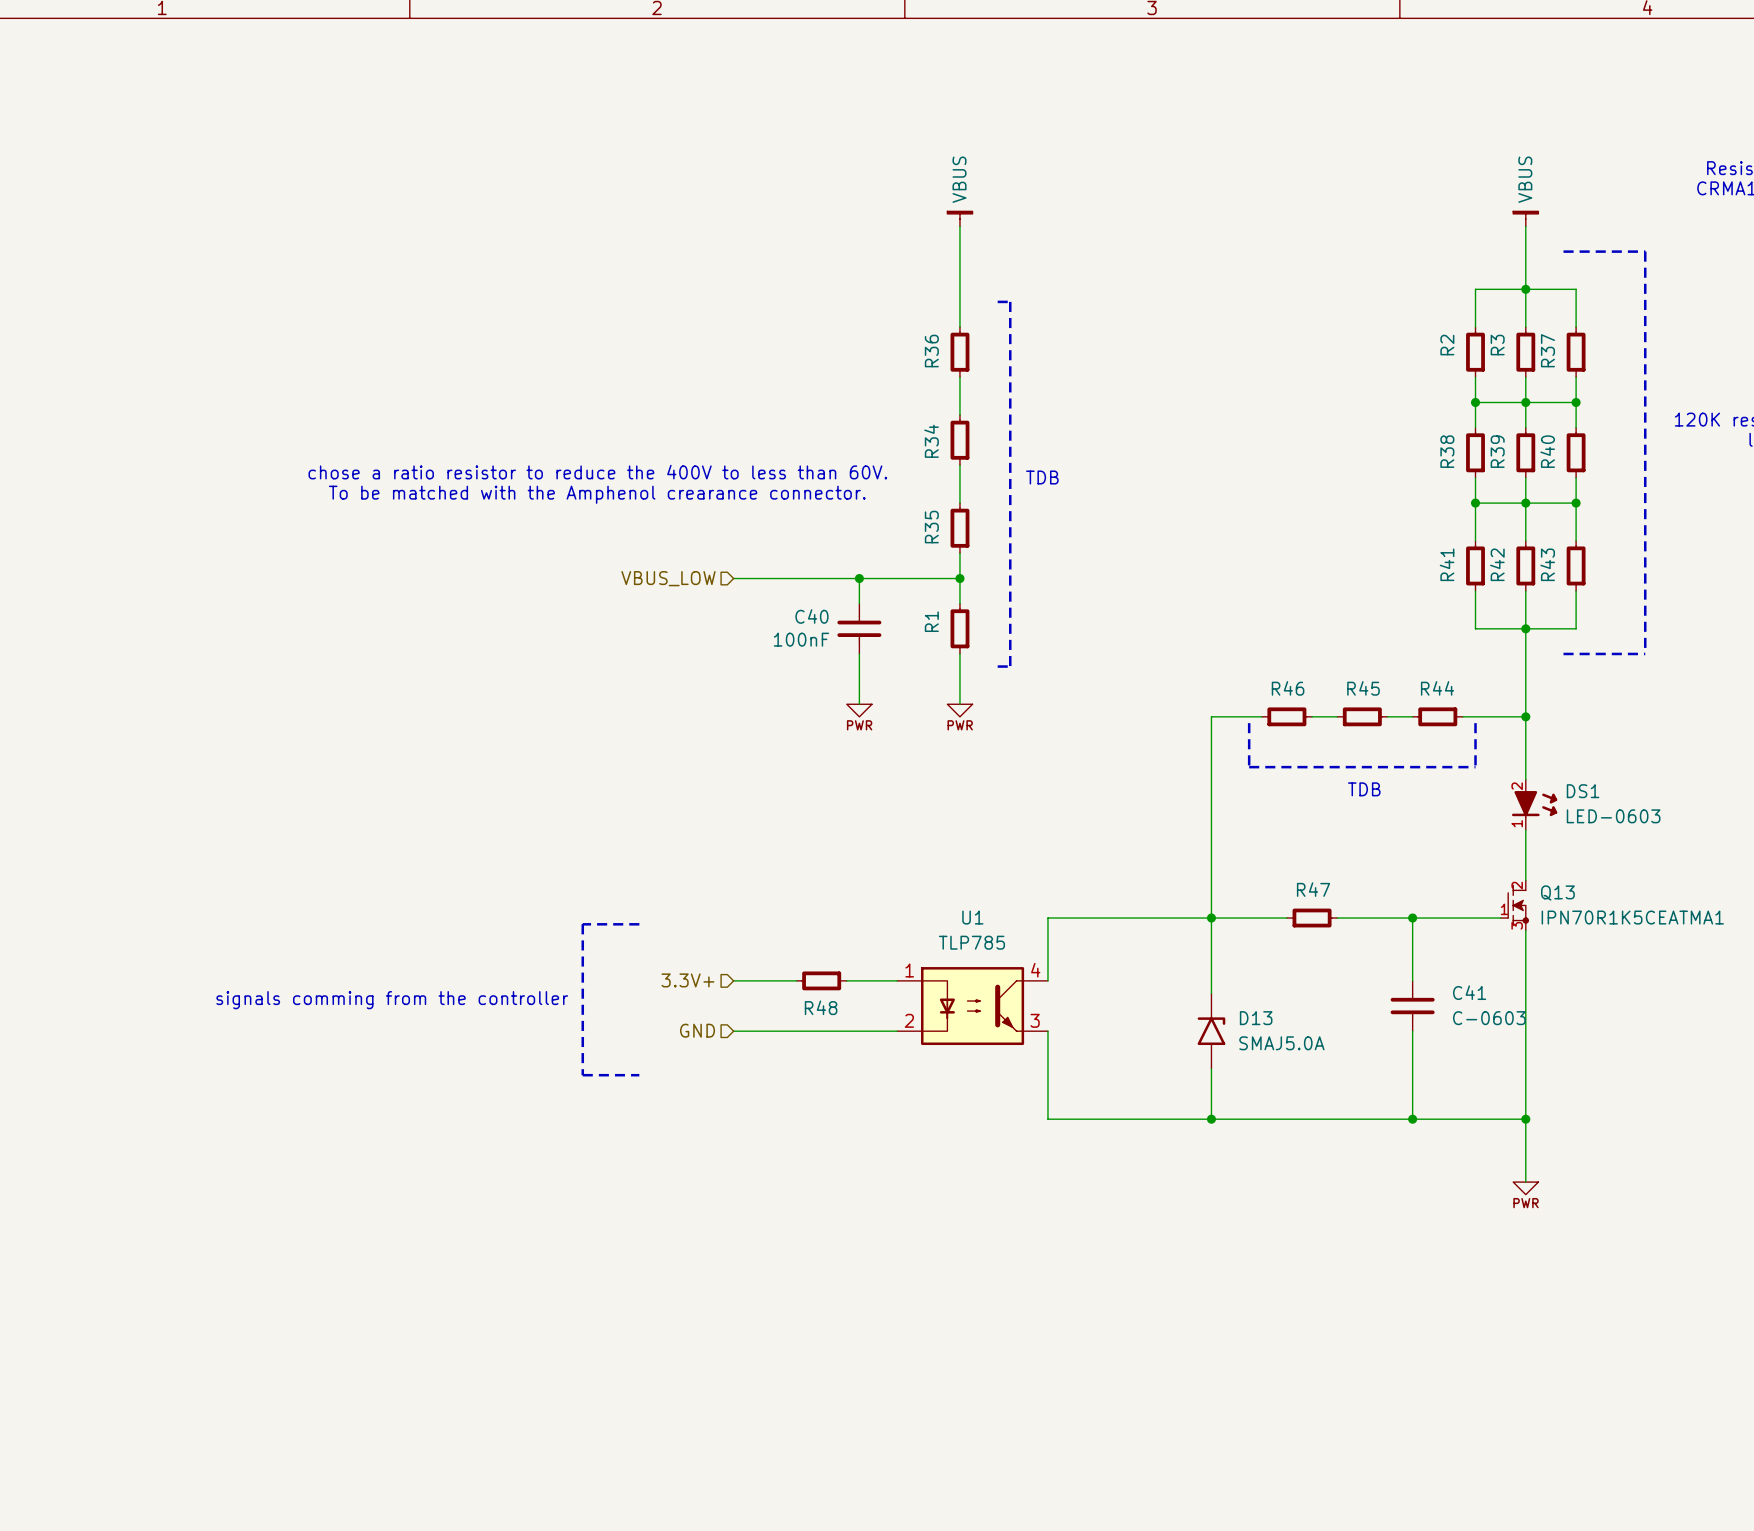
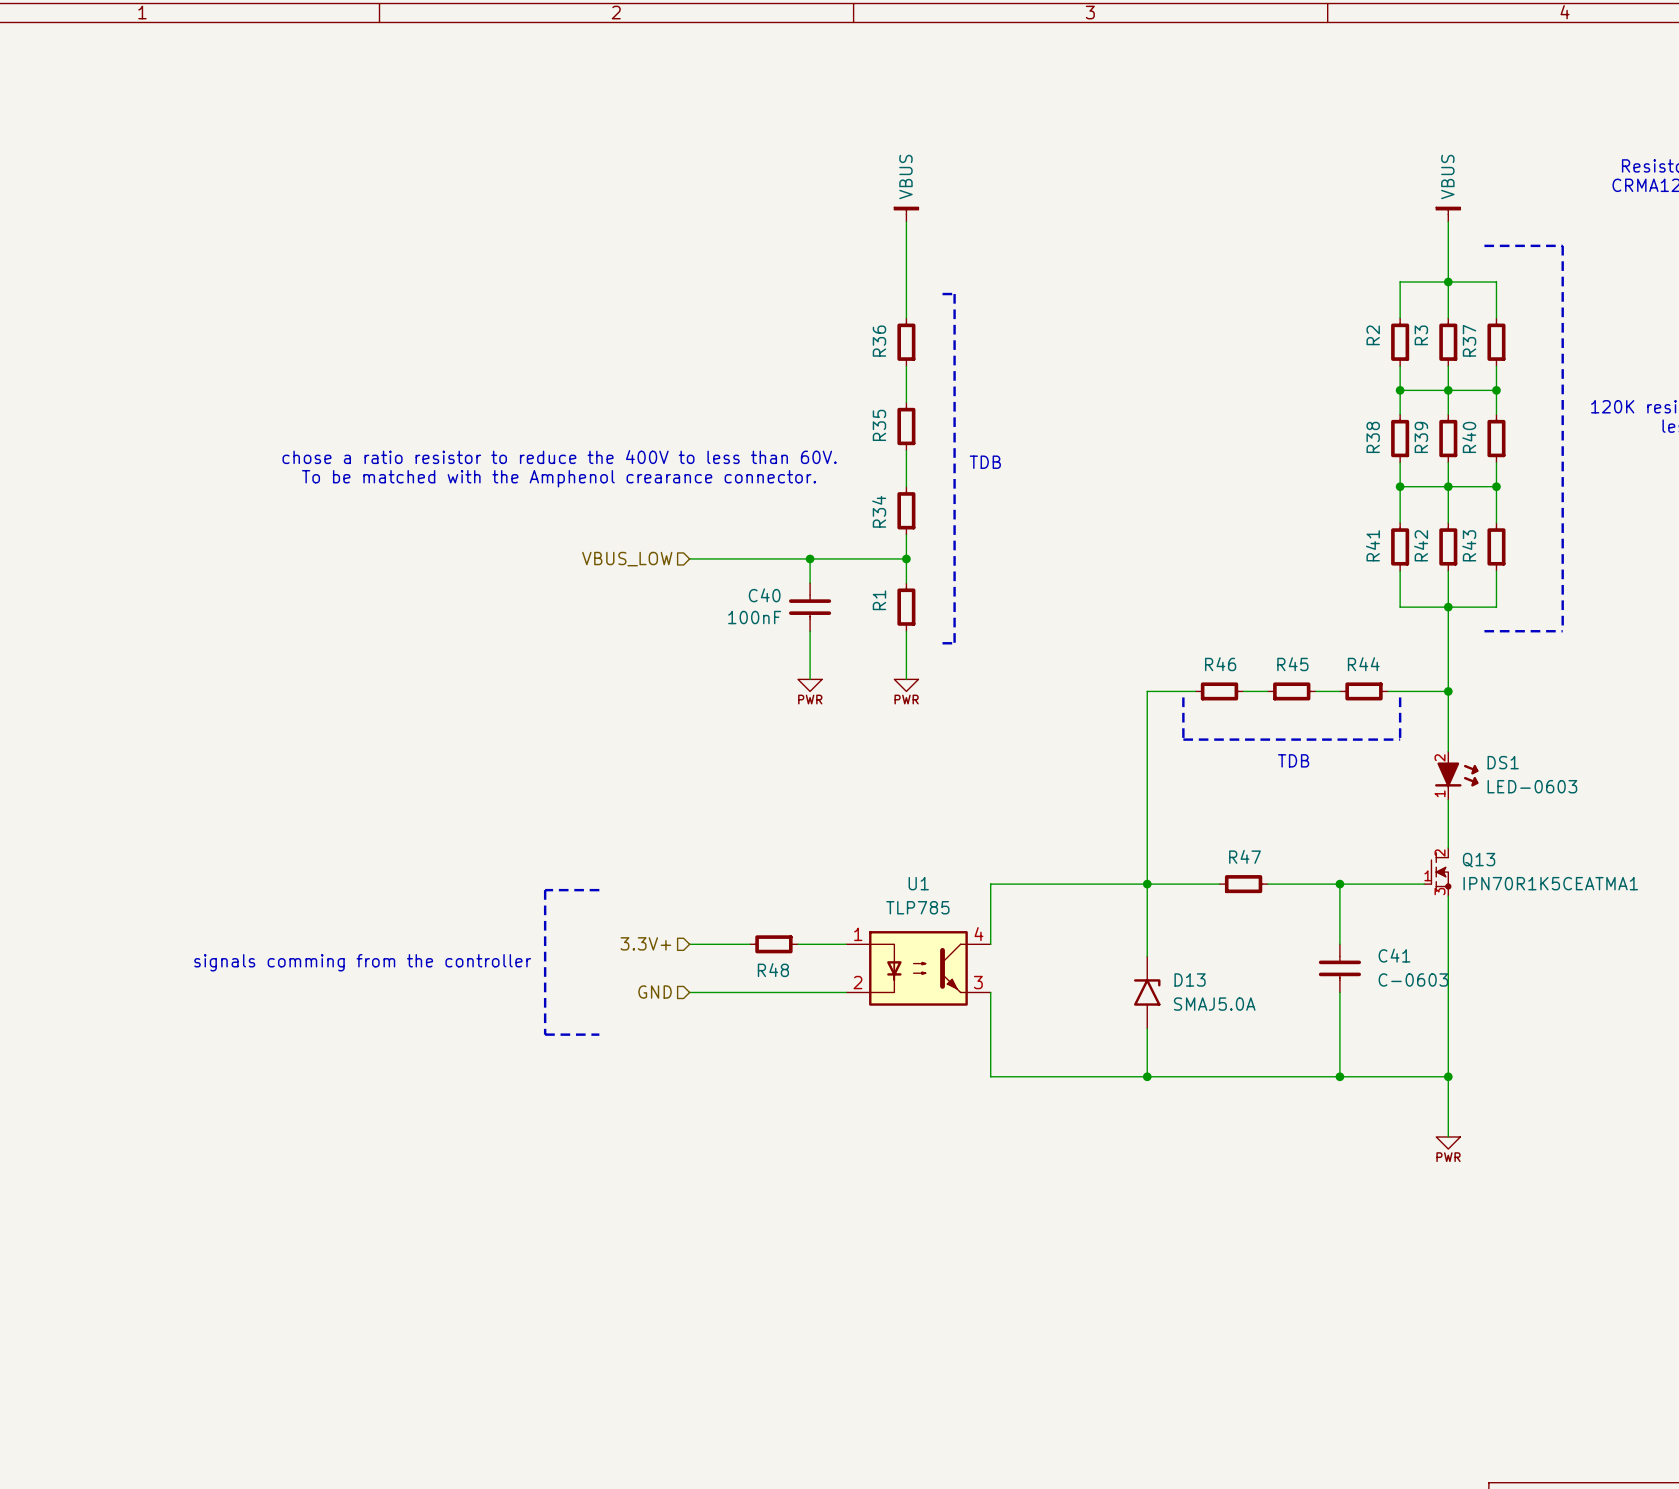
R34 name: R34 (931, 441) -> R35 (879, 425)
R35 name: R35 (931, 527) -> R34 (879, 511)

